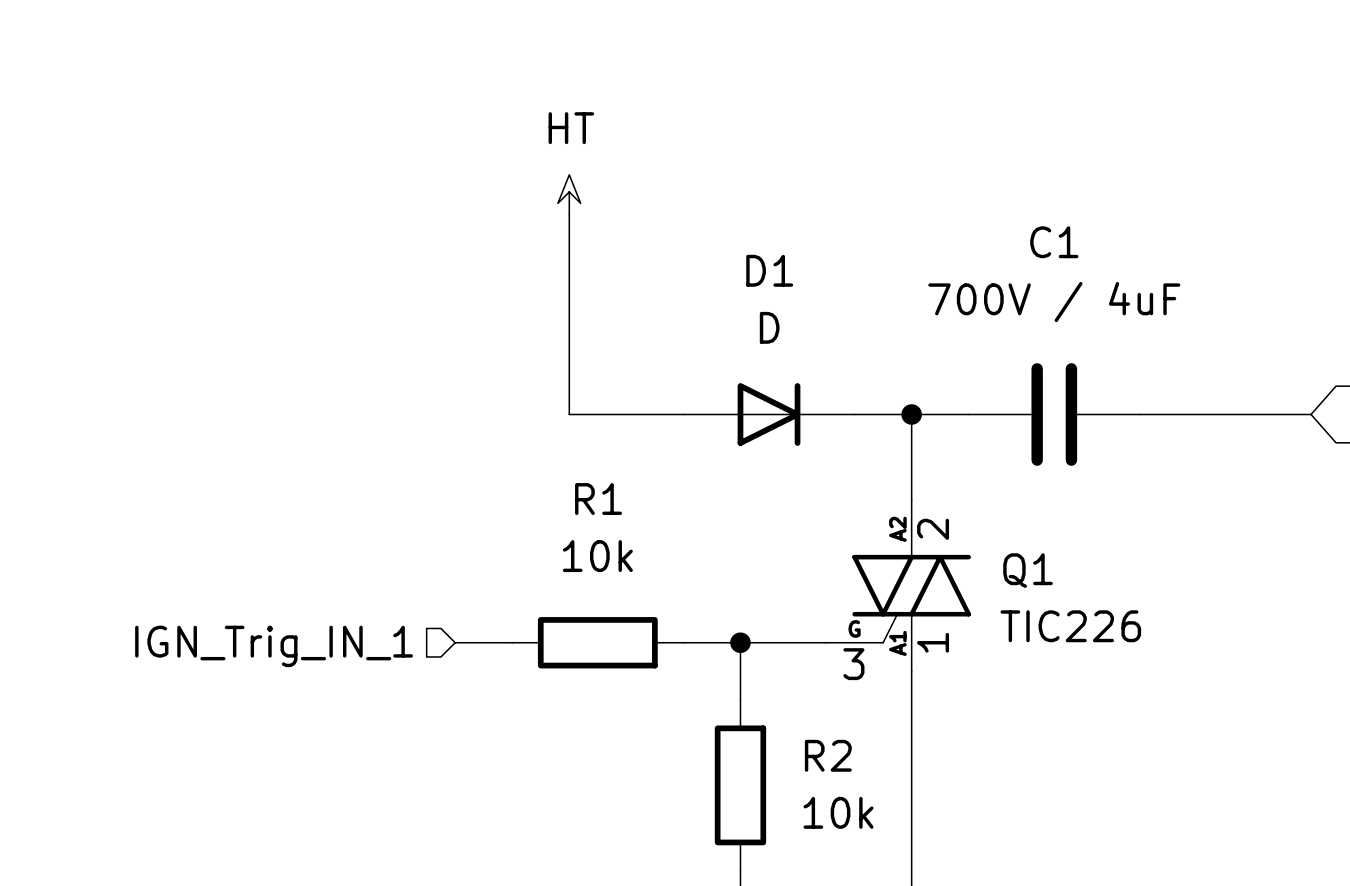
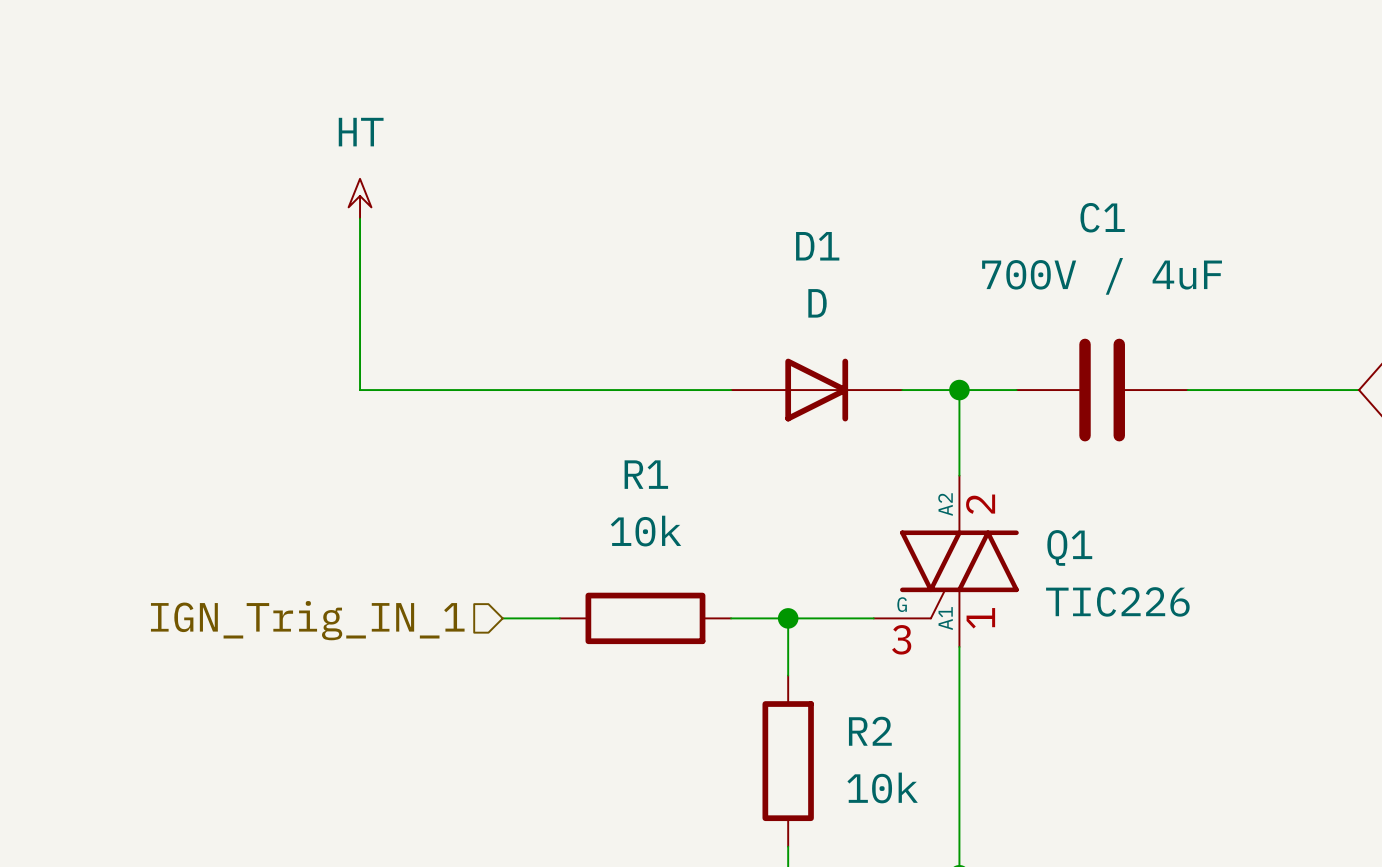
power symbol position: HT (569, 194) -> HT (360, 198)
wire: (569, 214) (569, 414) -> (360, 218) (360, 390) (616, 390)

